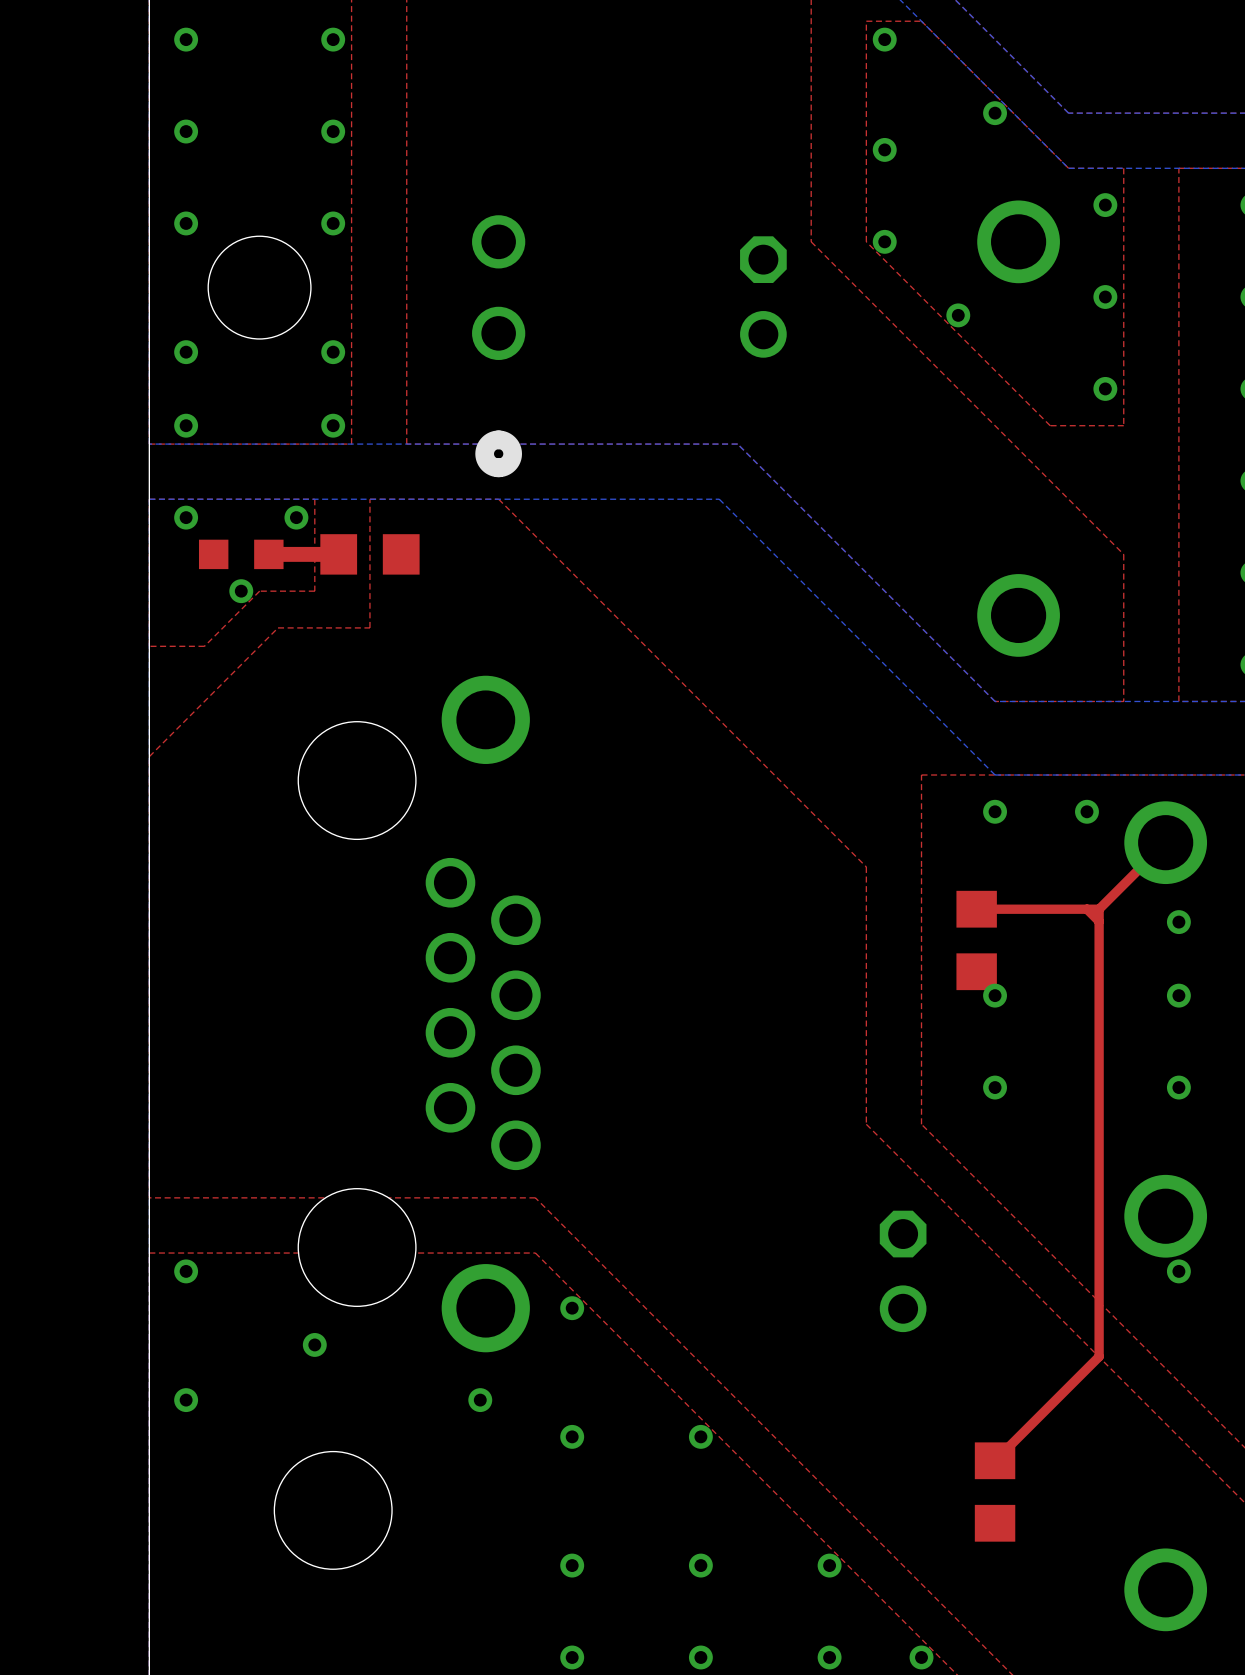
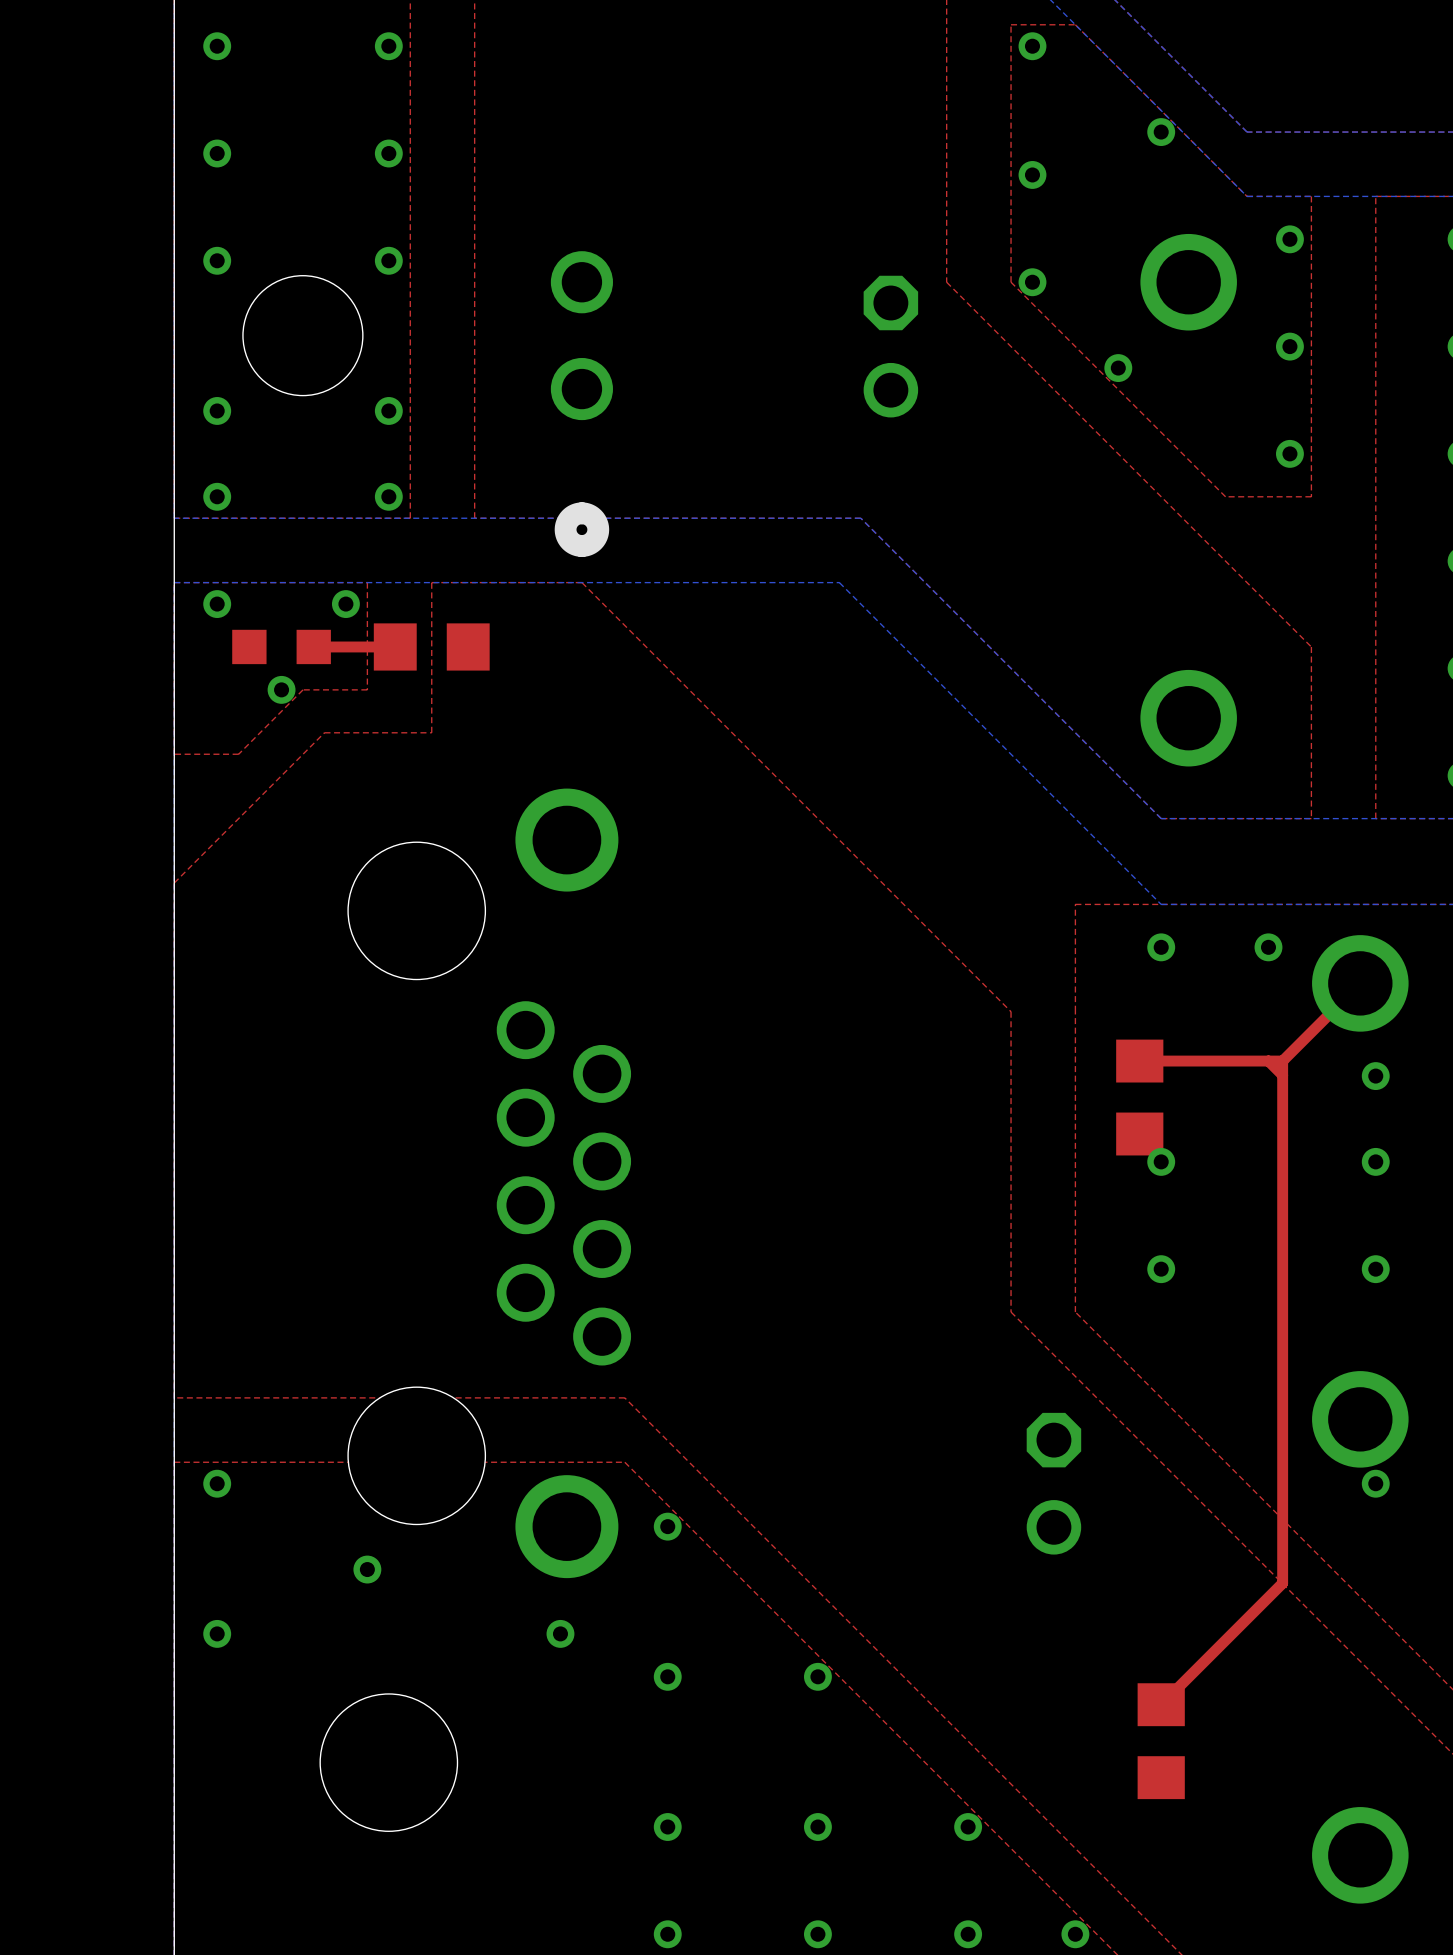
top track width: thick (338, 554) (268, 554) -> thin (395, 646) (313, 646)

